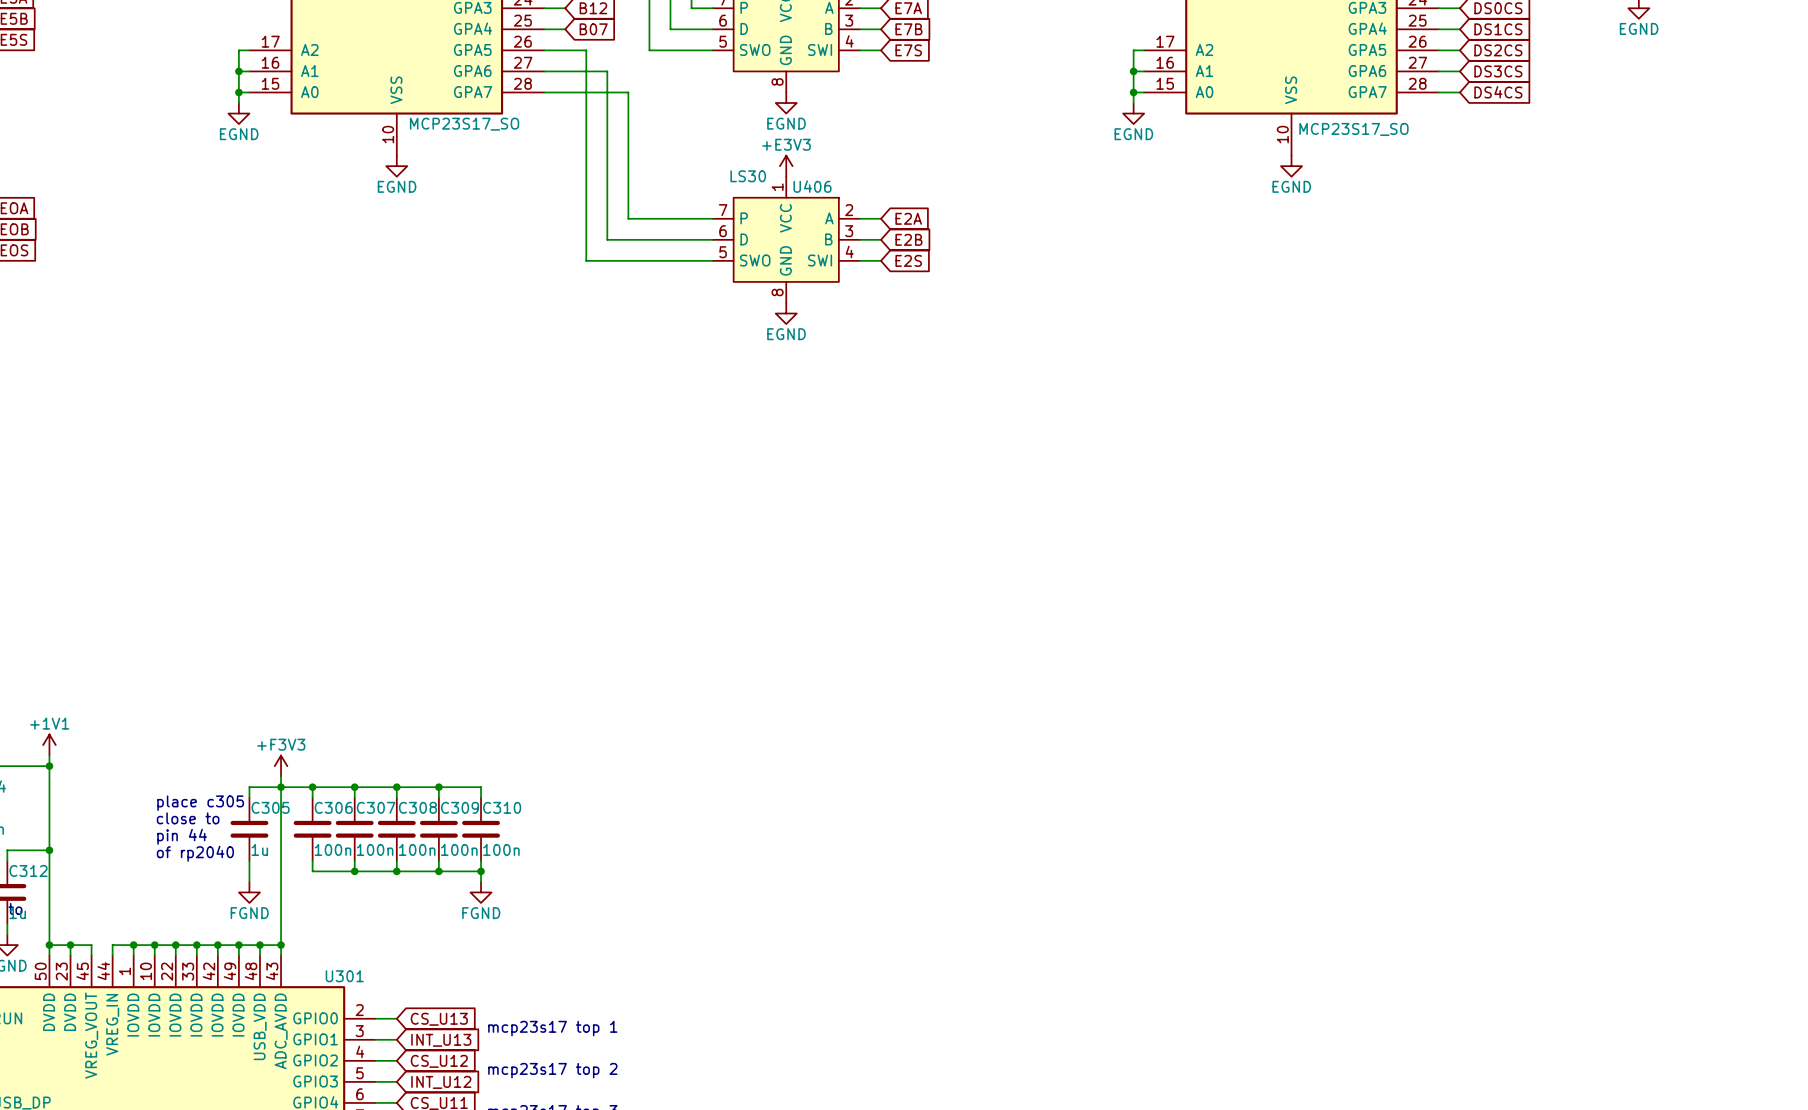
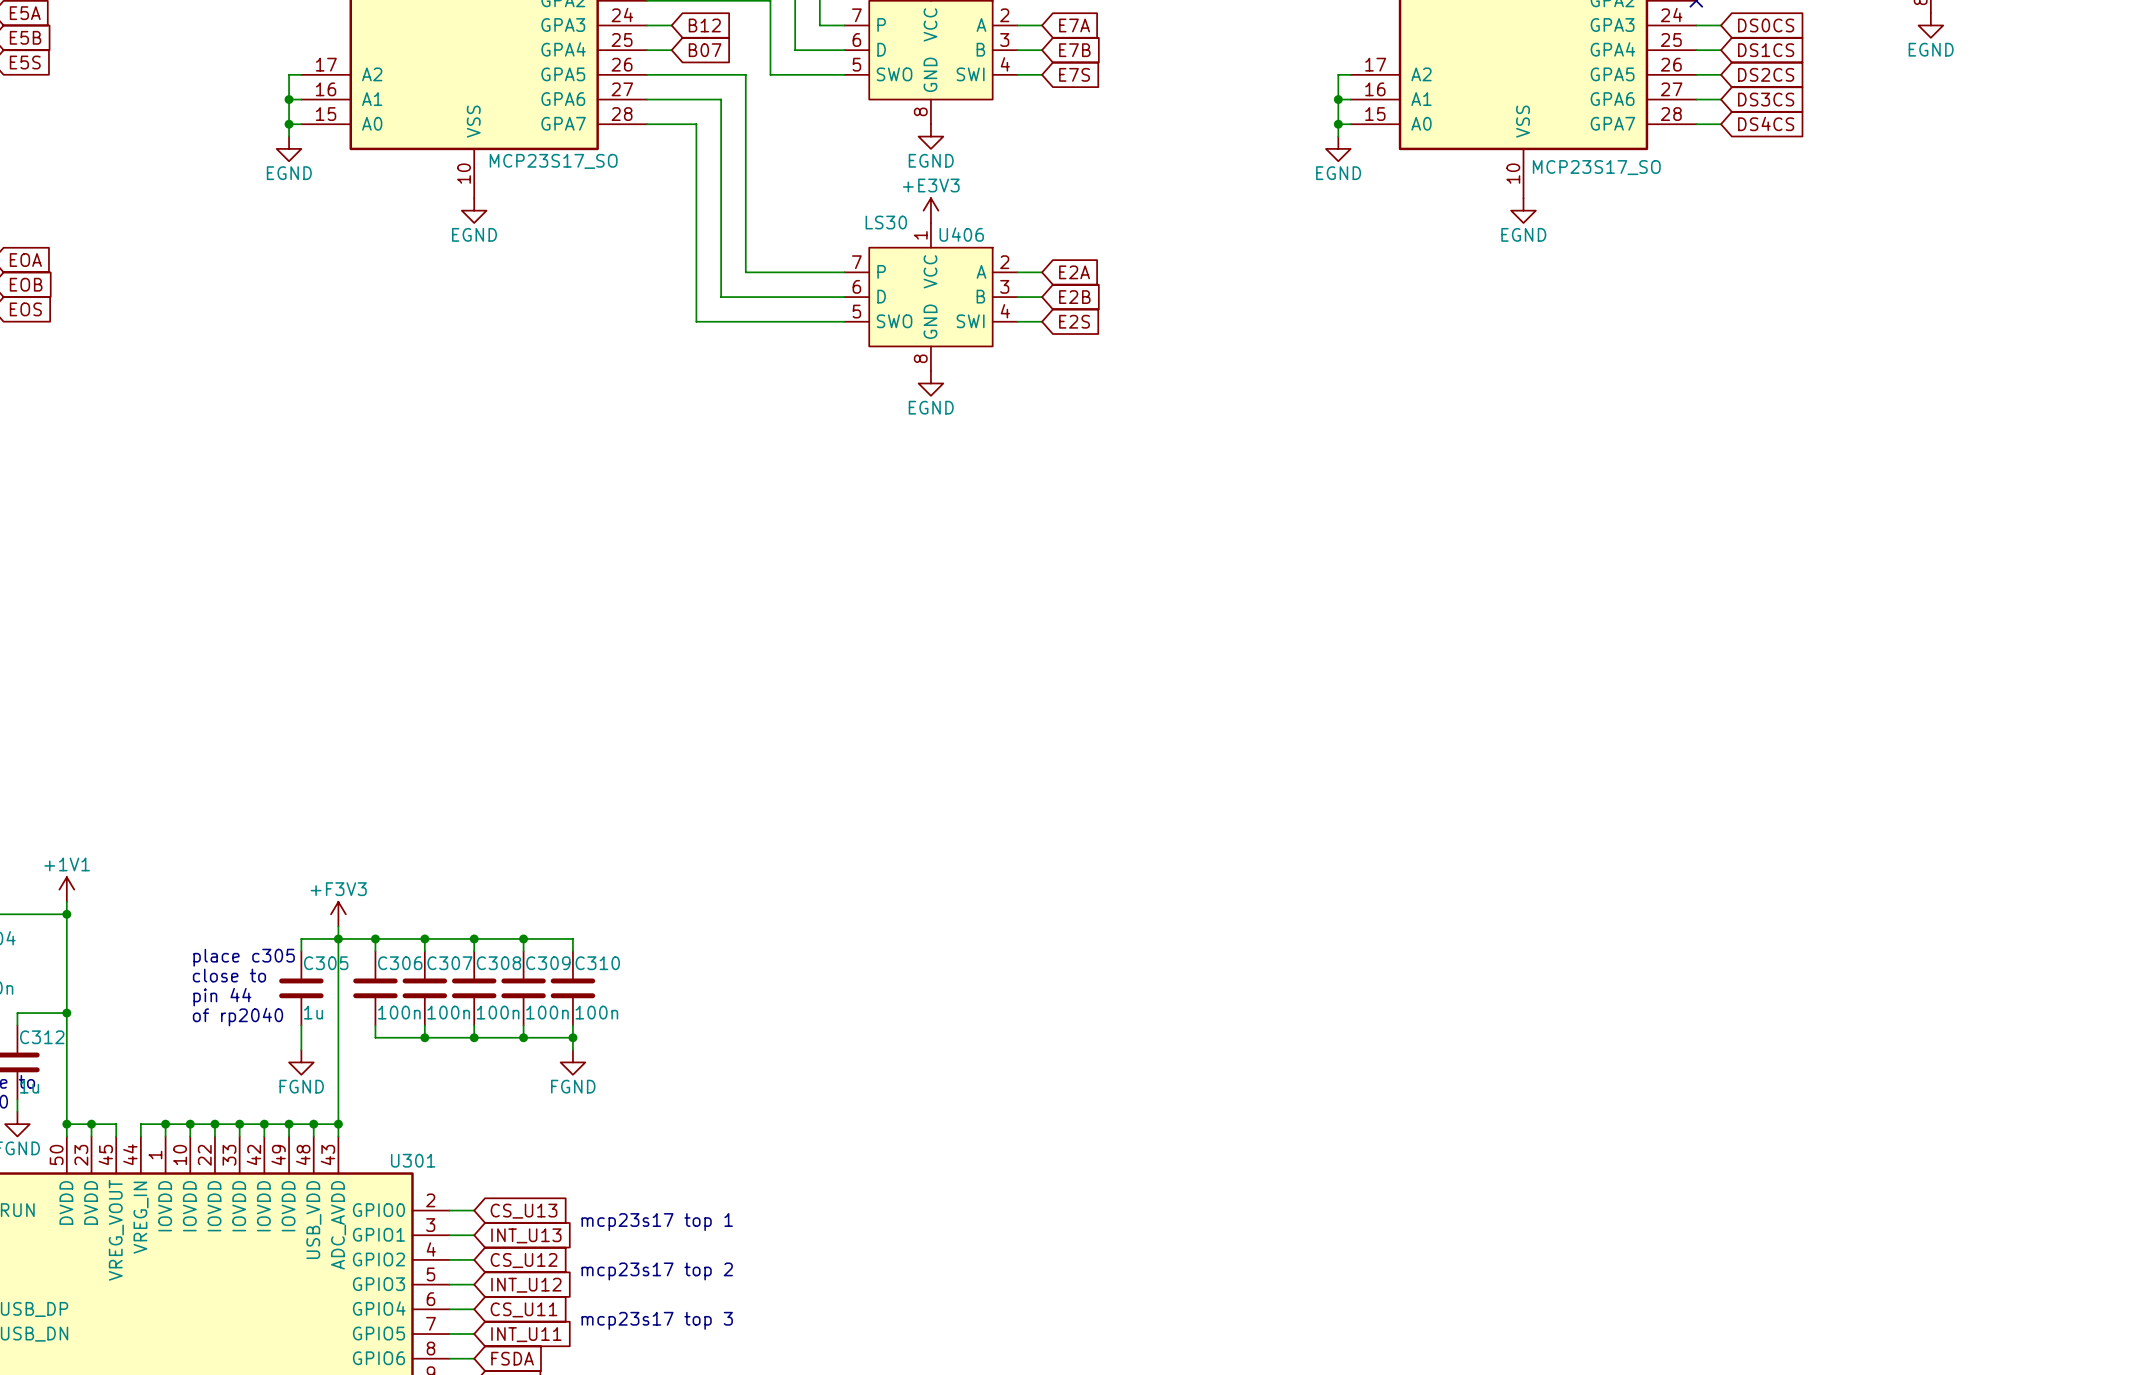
wire: (586, 50) (586, 92) (628, 92) -> (696, 74) (745, 74) (745, 124)

